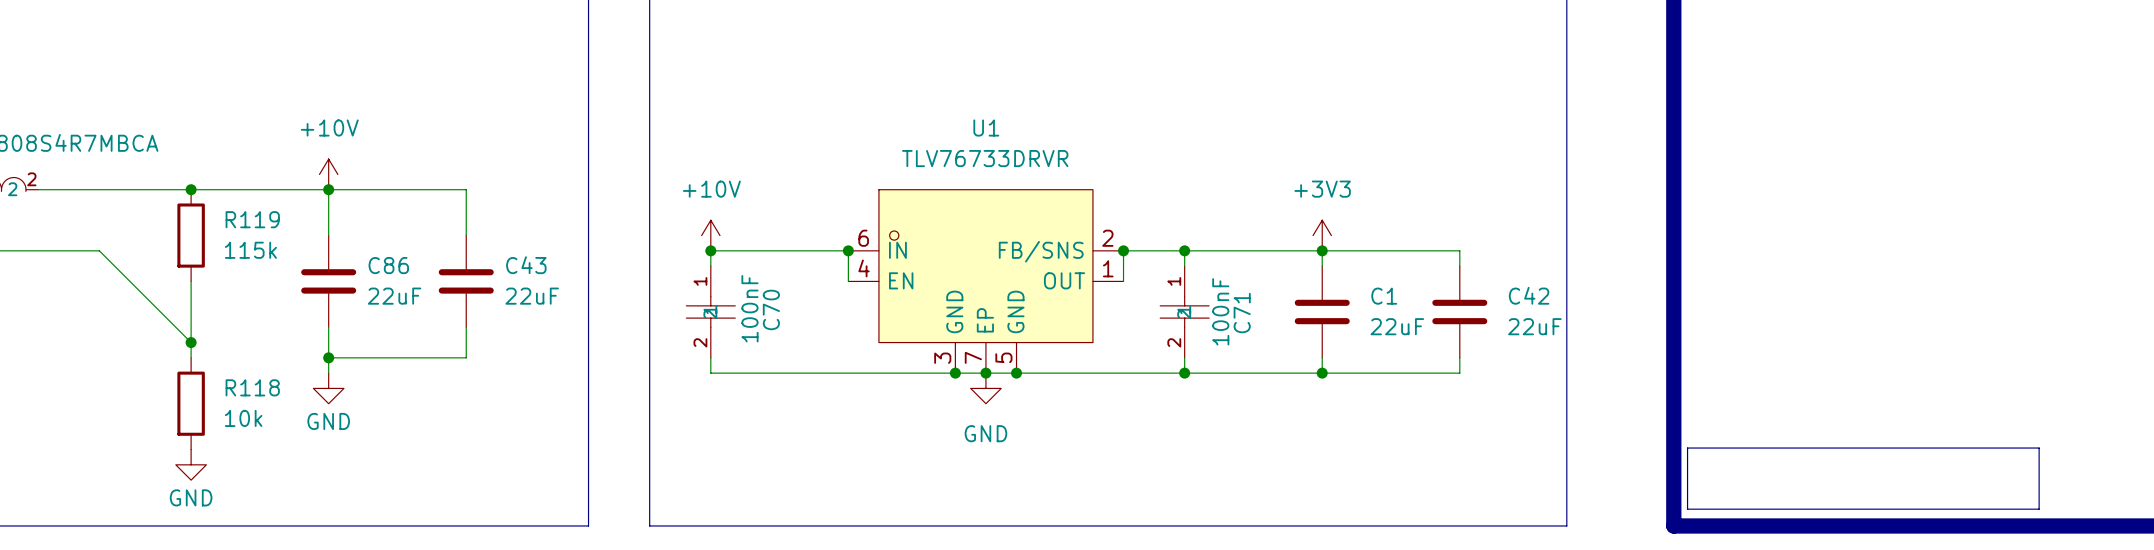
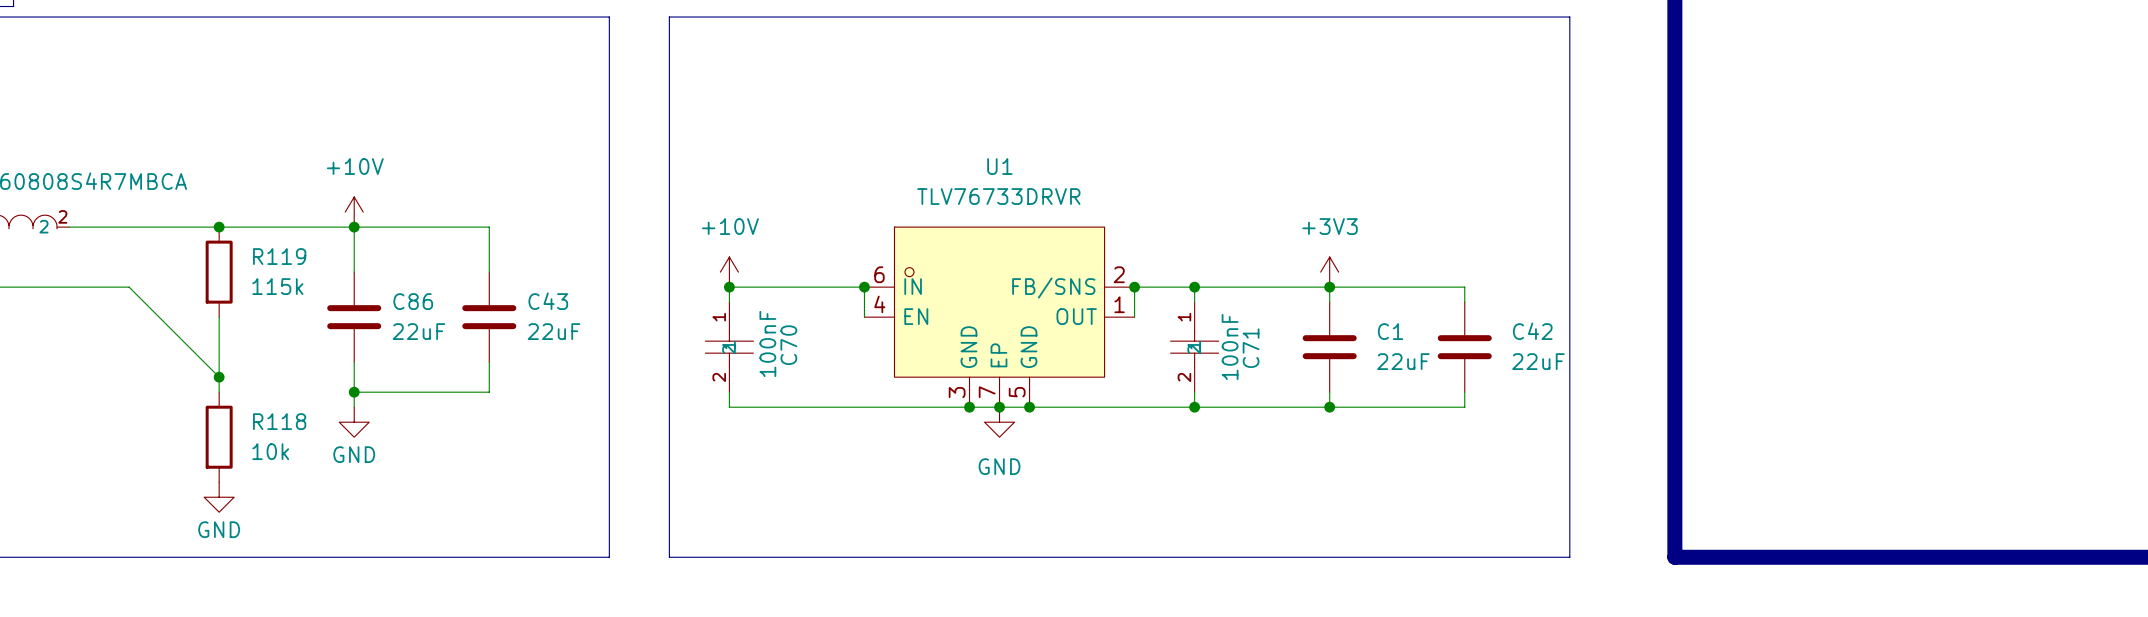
line: (1687, 448) (2039, 448) (2039, 509) (1687, 509) (1687, 448) -> none

